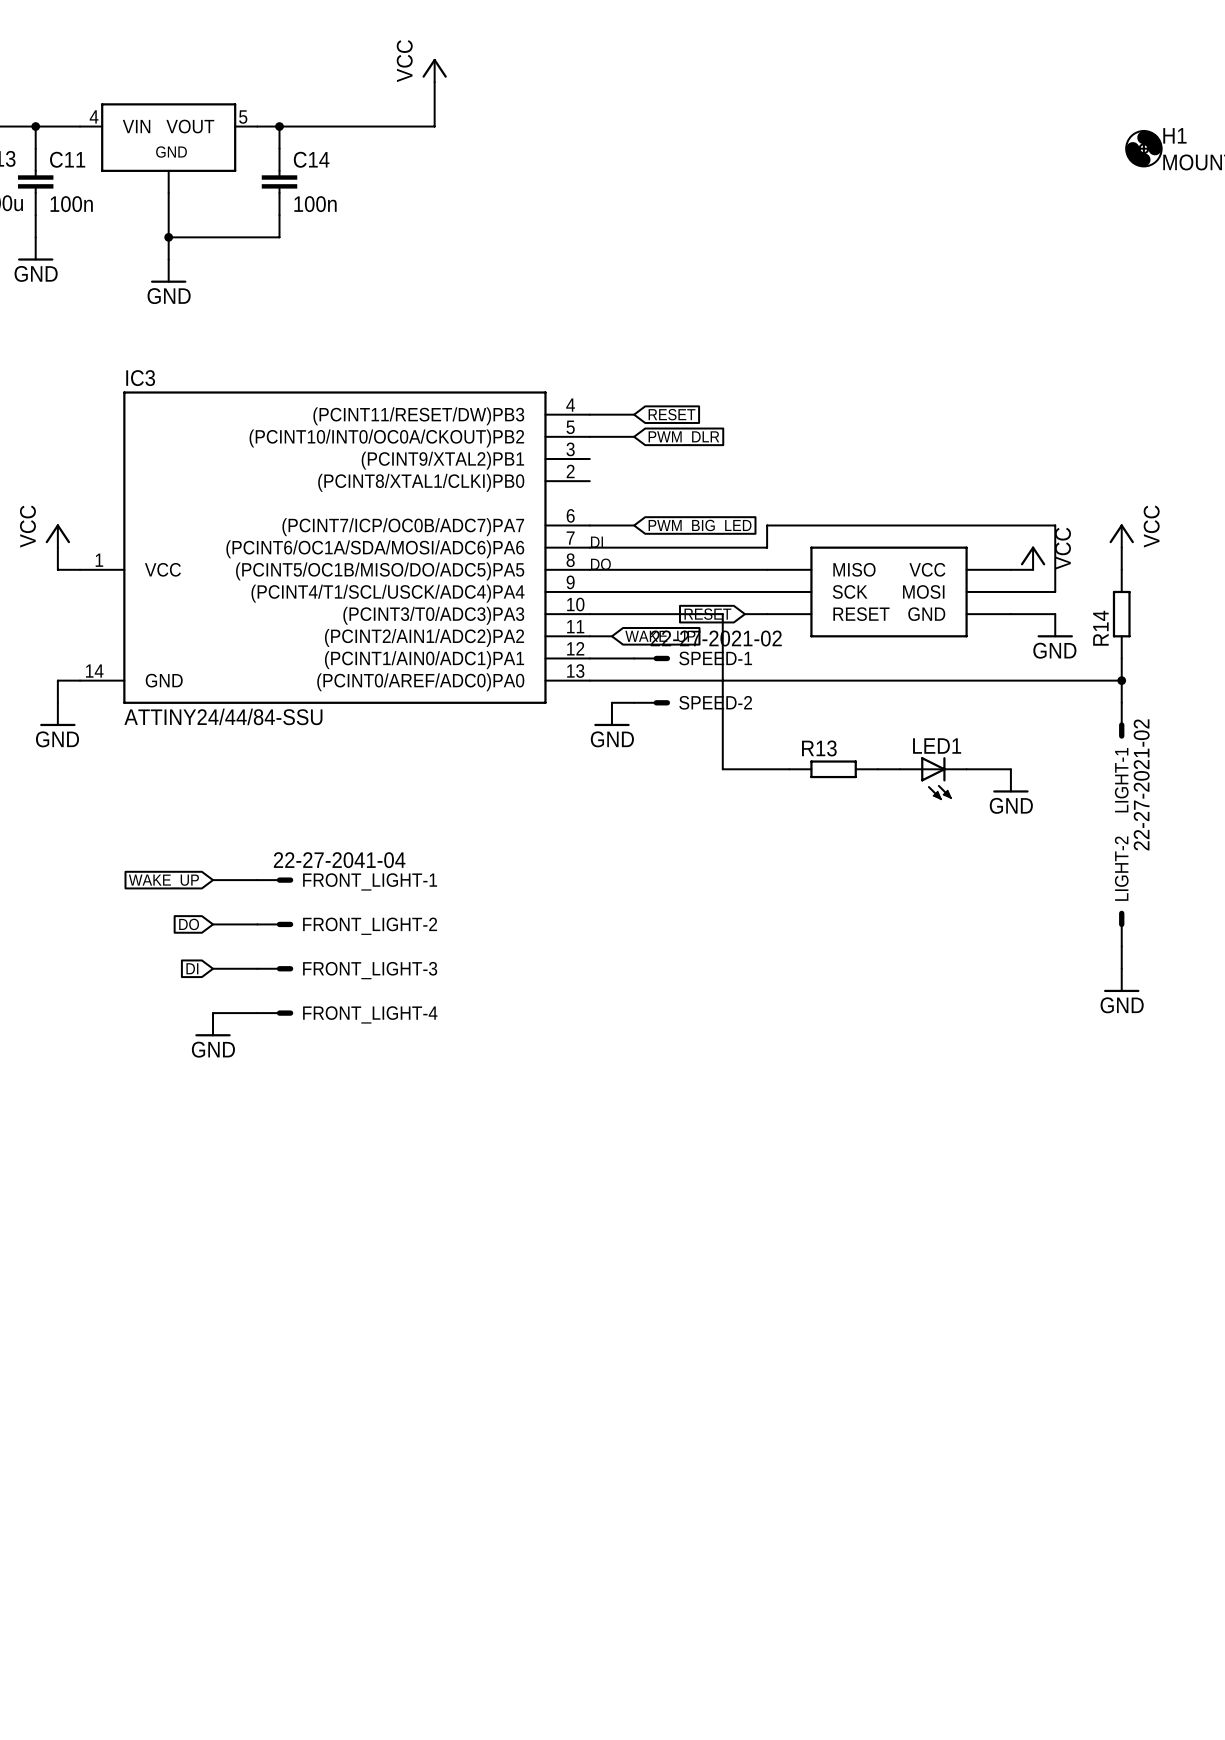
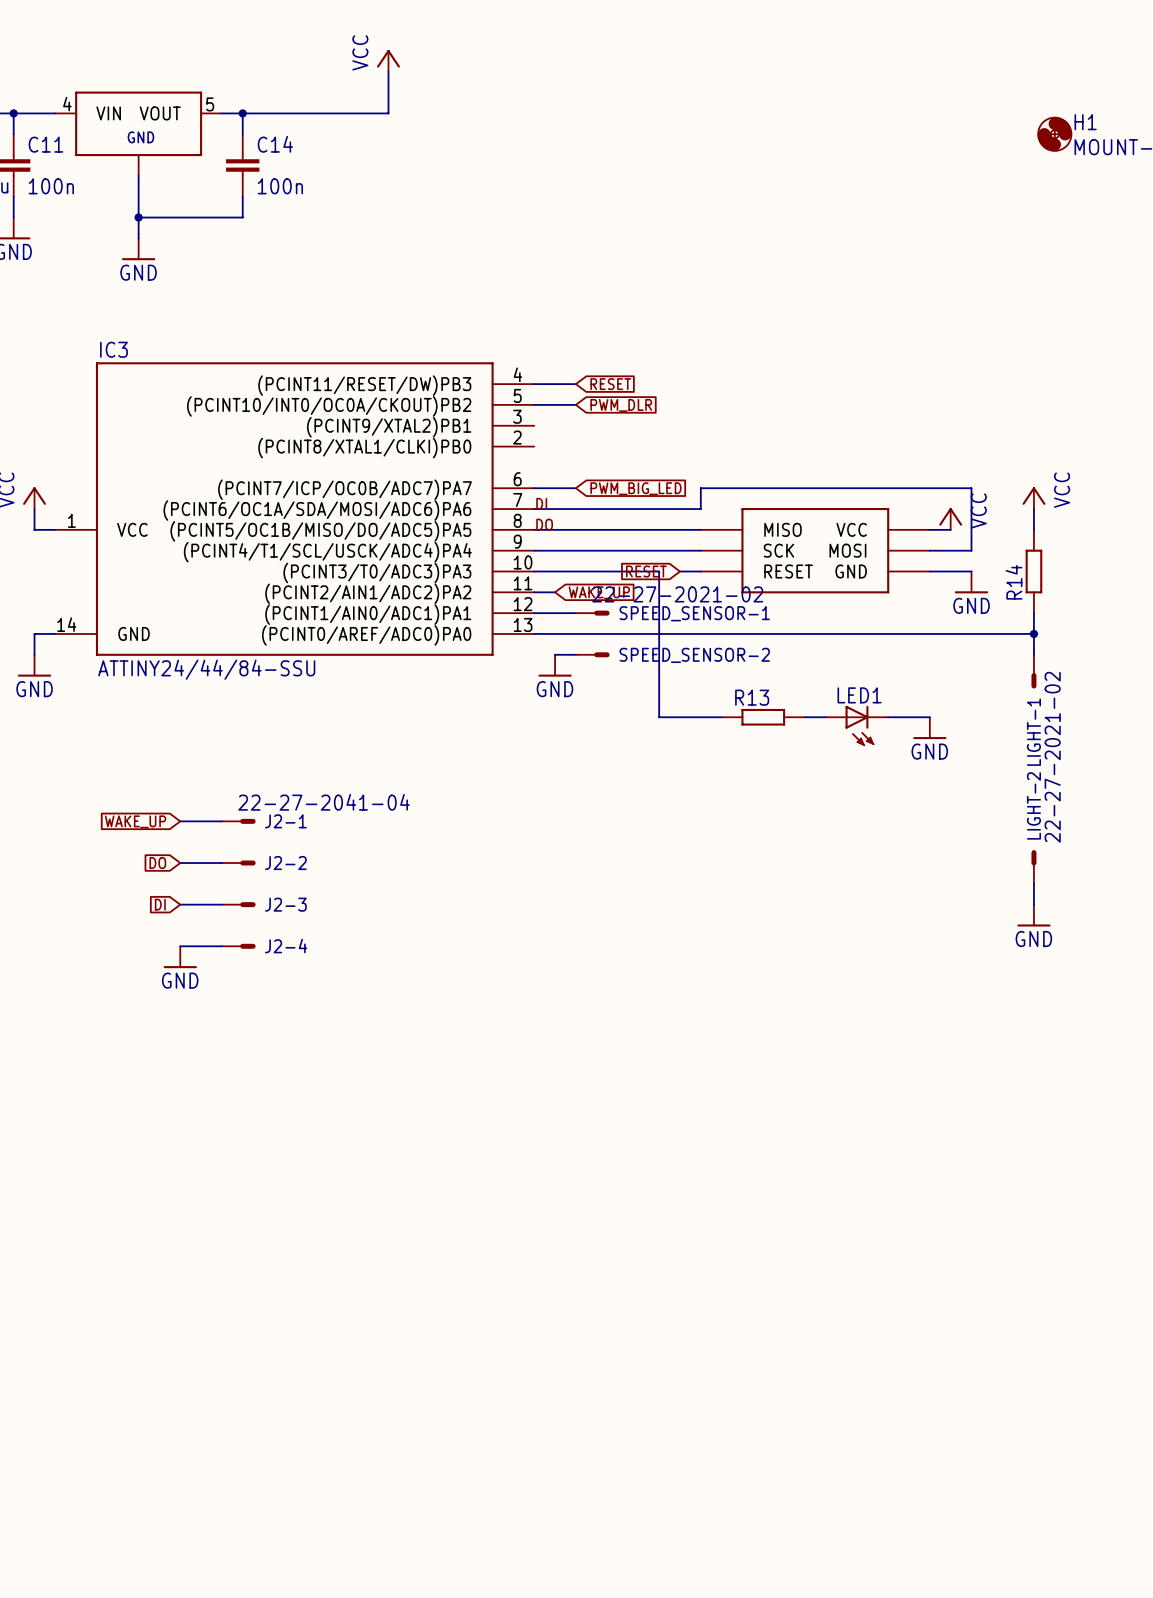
SPEED-1 name: SPEED-1 (715, 658) -> SPEED_SENSOR-1 (694, 613)
SPEED-2 name: SPEED-2 (715, 702) -> SPEED_SENSOR-2 (694, 655)
FRONT_LIGHT-1 name: FRONT_LIGHT-1 (370, 881) -> J2-1 (285, 821)
FRONT_LIGHT-2 name: FRONT_LIGHT-2 (370, 926) -> J2-2 (285, 863)
FRONT_LIGHT-3 name: FRONT_LIGHT-3 (370, 970) -> J2-3 (285, 904)
FRONT_LIGHT-4 name: FRONT_LIGHT-4 (370, 1014) -> J2-4 (286, 946)

